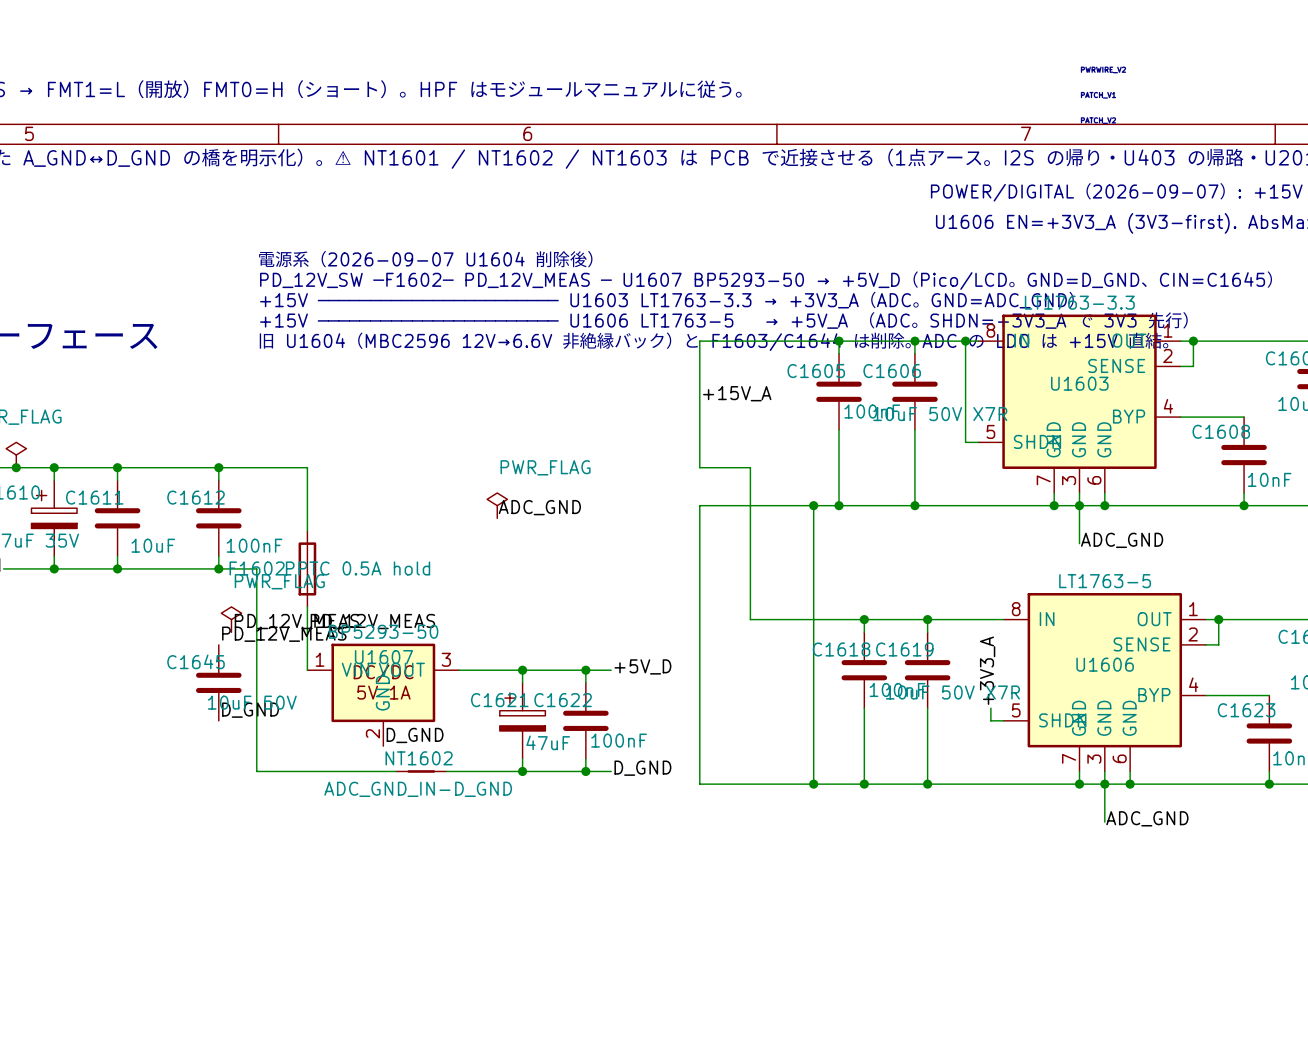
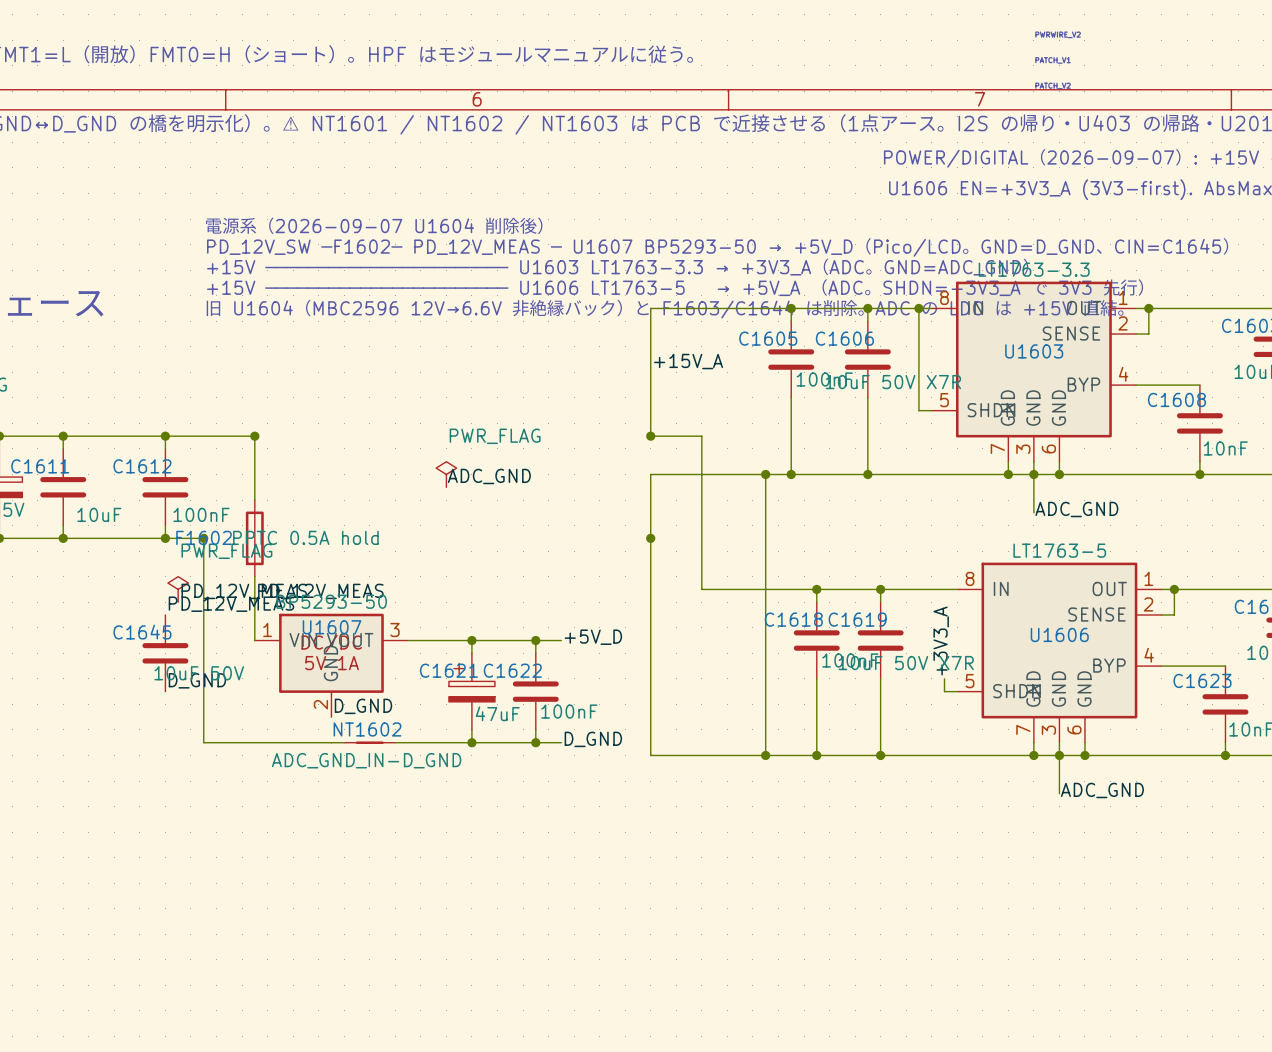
junction: none -> (254, 436)
junction: none -> (650, 436)
junction: none -> (203, 538)
junction: none -> (650, 538)

